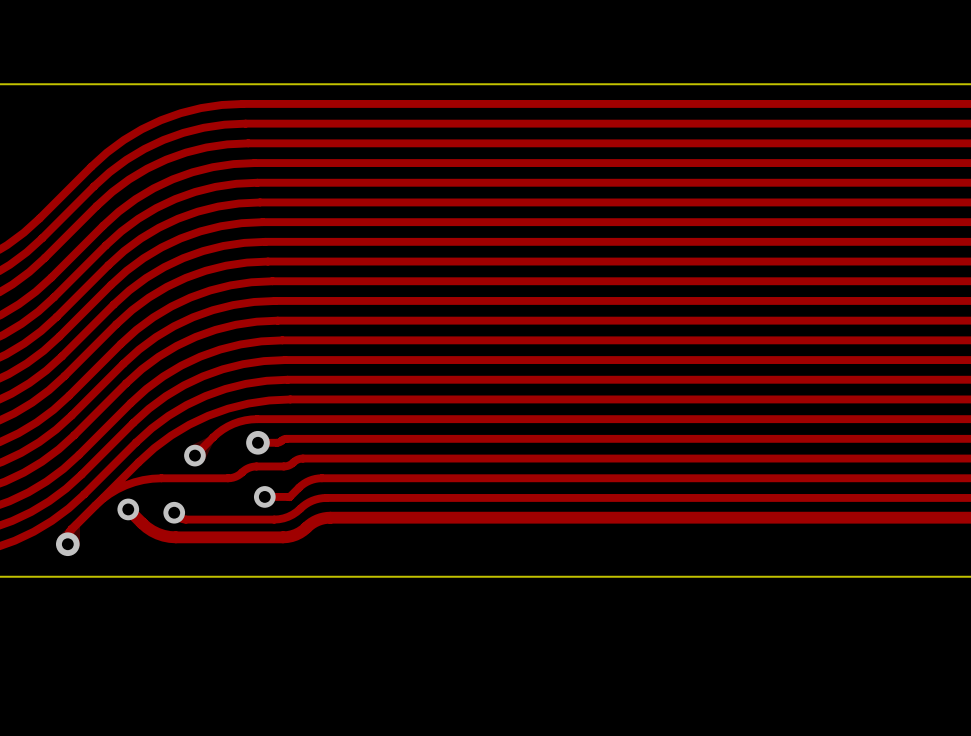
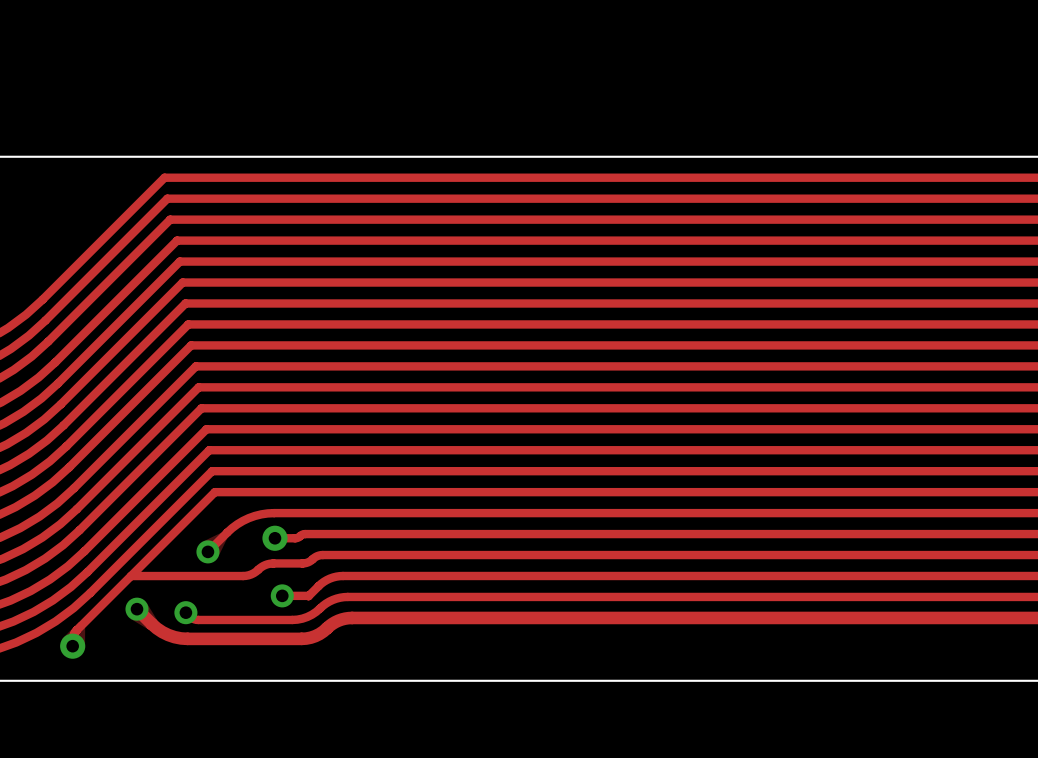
track: (242, 103) (201, 108) (160, 120) (123, 140) (91, 166) -> (259, 177) (164, 177) (97, 244)
track: (245, 123) (203, 127) (163, 139) (126, 159) (94, 186) -> (261, 198) (167, 198) (100, 265)
track: (248, 143) (206, 147) (166, 159) (129, 179) (96, 206) -> (264, 219) (170, 219) (103, 286)
track: (254, 163) (212, 167) (172, 179) (135, 199) (103, 225) -> (271, 240) (177, 240) (110, 307)
track: (257, 182) (215, 186) (175, 199) (138, 218) (105, 245) -> (274, 261) (179, 261) (113, 328)
track: (260, 202) (218, 206) (177, 218) (140, 238) (108, 265) -> (277, 282) (182, 282) (115, 349)
track: (262, 222) (220, 226) (180, 238) (143, 258) (111, 284) -> (280, 303) (185, 303) (118, 370)
track: (265, 241) (223, 245) (183, 258) (146, 277) (113, 304) -> (282, 324) (188, 324) (121, 391)
track: (267, 261) (226, 265) (185, 277) (148, 297) (116, 324) -> (285, 345) (191, 345) (124, 412)
track: (272, 281) (230, 285) (190, 297) (153, 317) (120, 344) -> (290, 366) (195, 366) (129, 433)
track: (275, 300) (233, 305) (193, 317) (155, 337) (123, 363) -> (293, 387) (198, 387) (131, 454)
track: (277, 320) (235, 324) (195, 336) (158, 356) (126, 383) -> (296, 408) (201, 408) (134, 475)
track: (282, 340) (240, 344) (200, 356) (163, 376) (130, 403) -> (300, 429) (206, 429) (139, 496)
track: (285, 360) (243, 364) (202, 376) (165, 396) (133, 422) -> (303, 450) (209, 450) (142, 517)
track: (287, 379) (245, 383) (205, 396) (168, 415) (136, 442) -> (306, 471) (212, 471) (145, 538)
track: (290, 399) (248, 403) (208, 415) (171, 435) (138, 462) -> (309, 492) (214, 492) (148, 558)
track: (161, 478) (143, 480) (125, 485) (109, 494) (95, 505) -> (172, 576) (131, 576)

